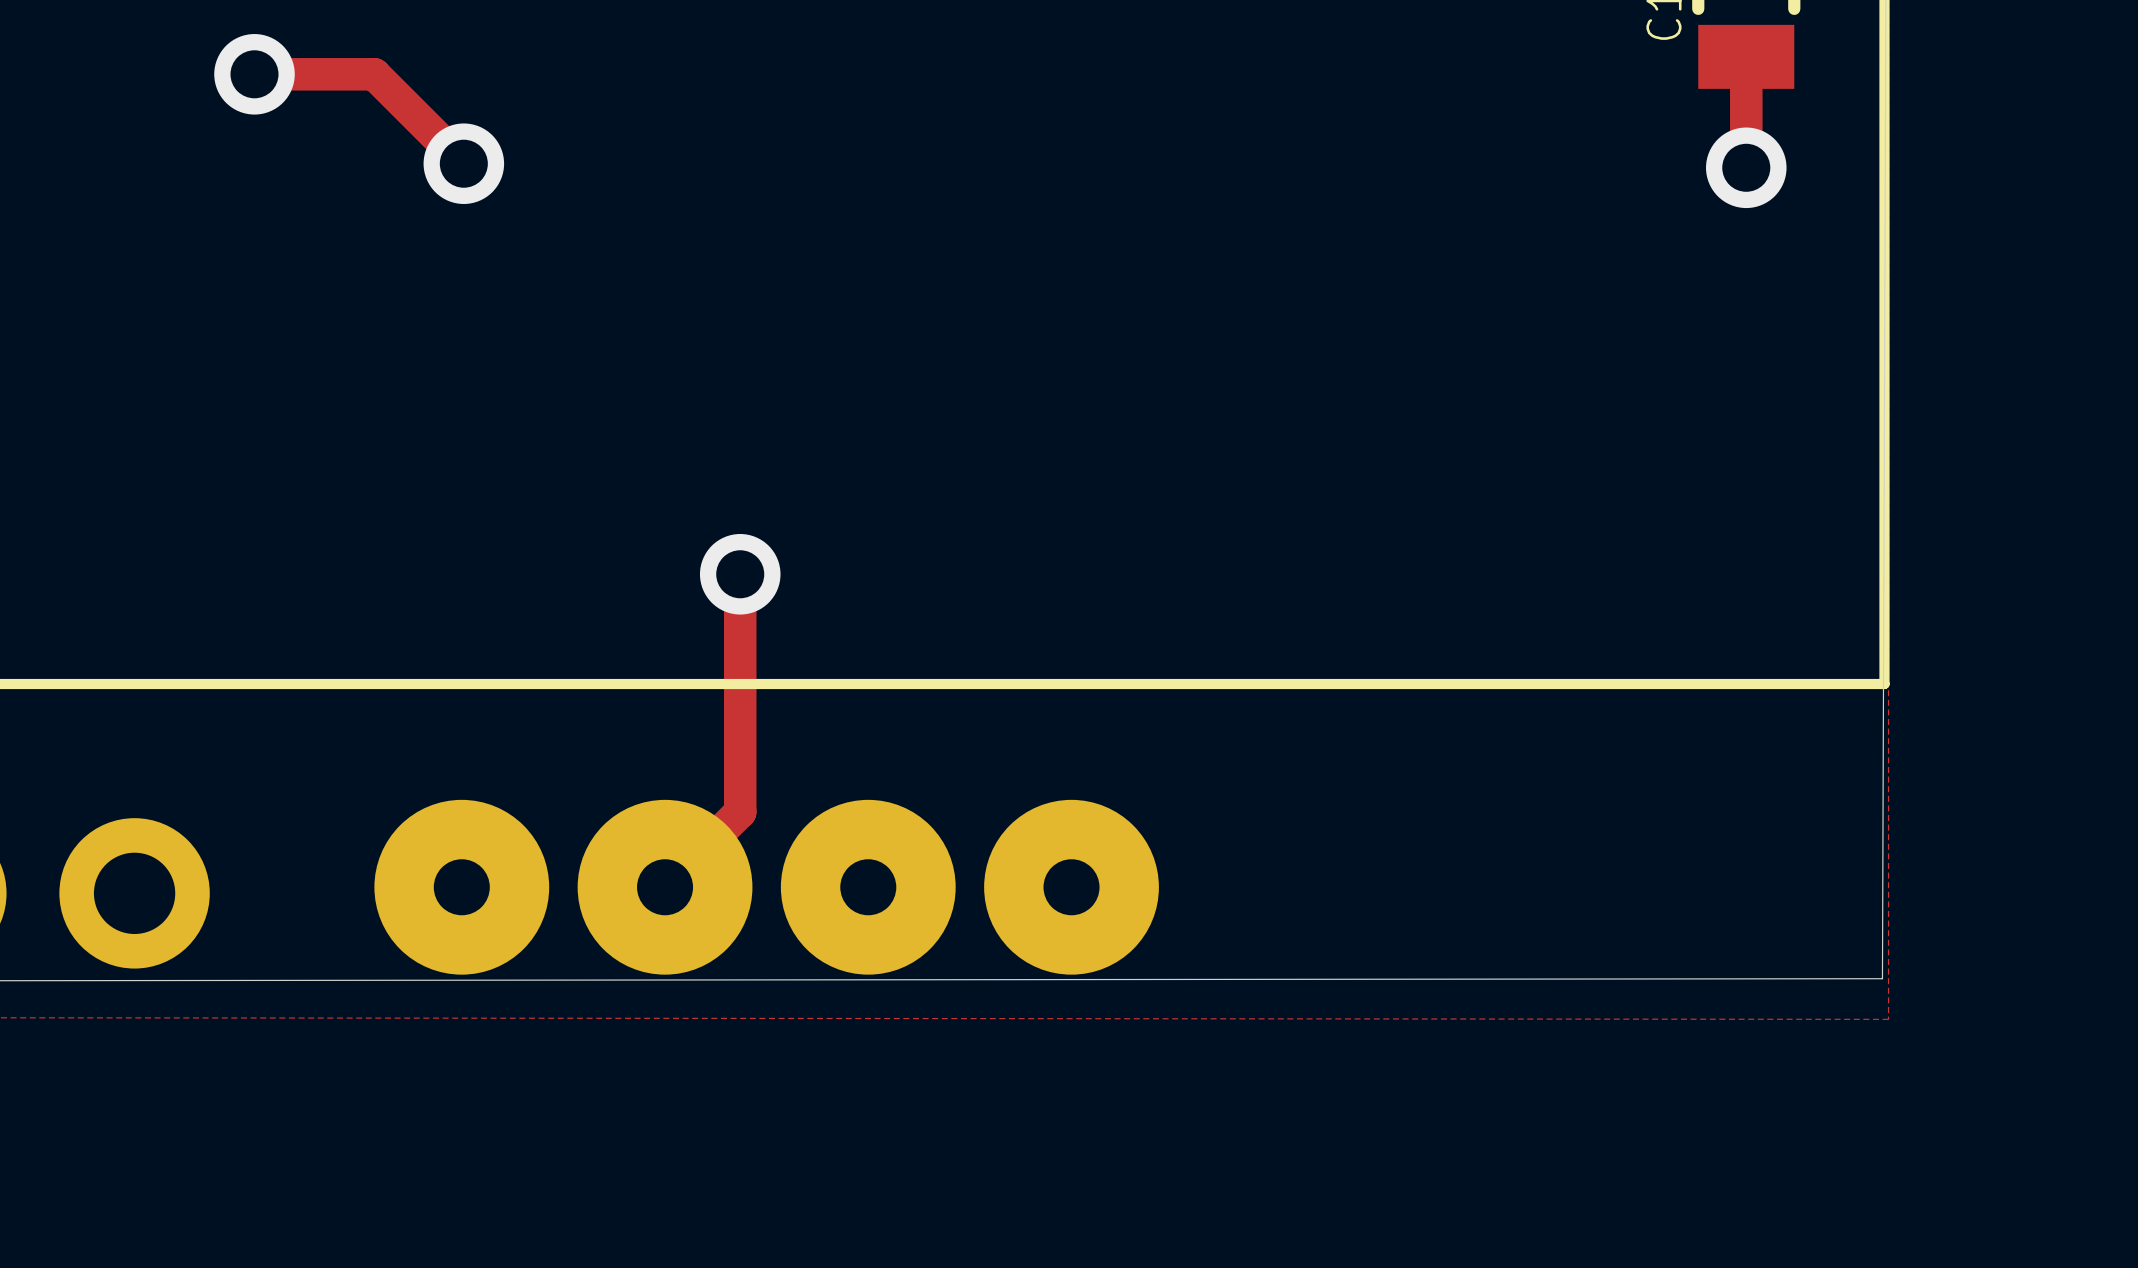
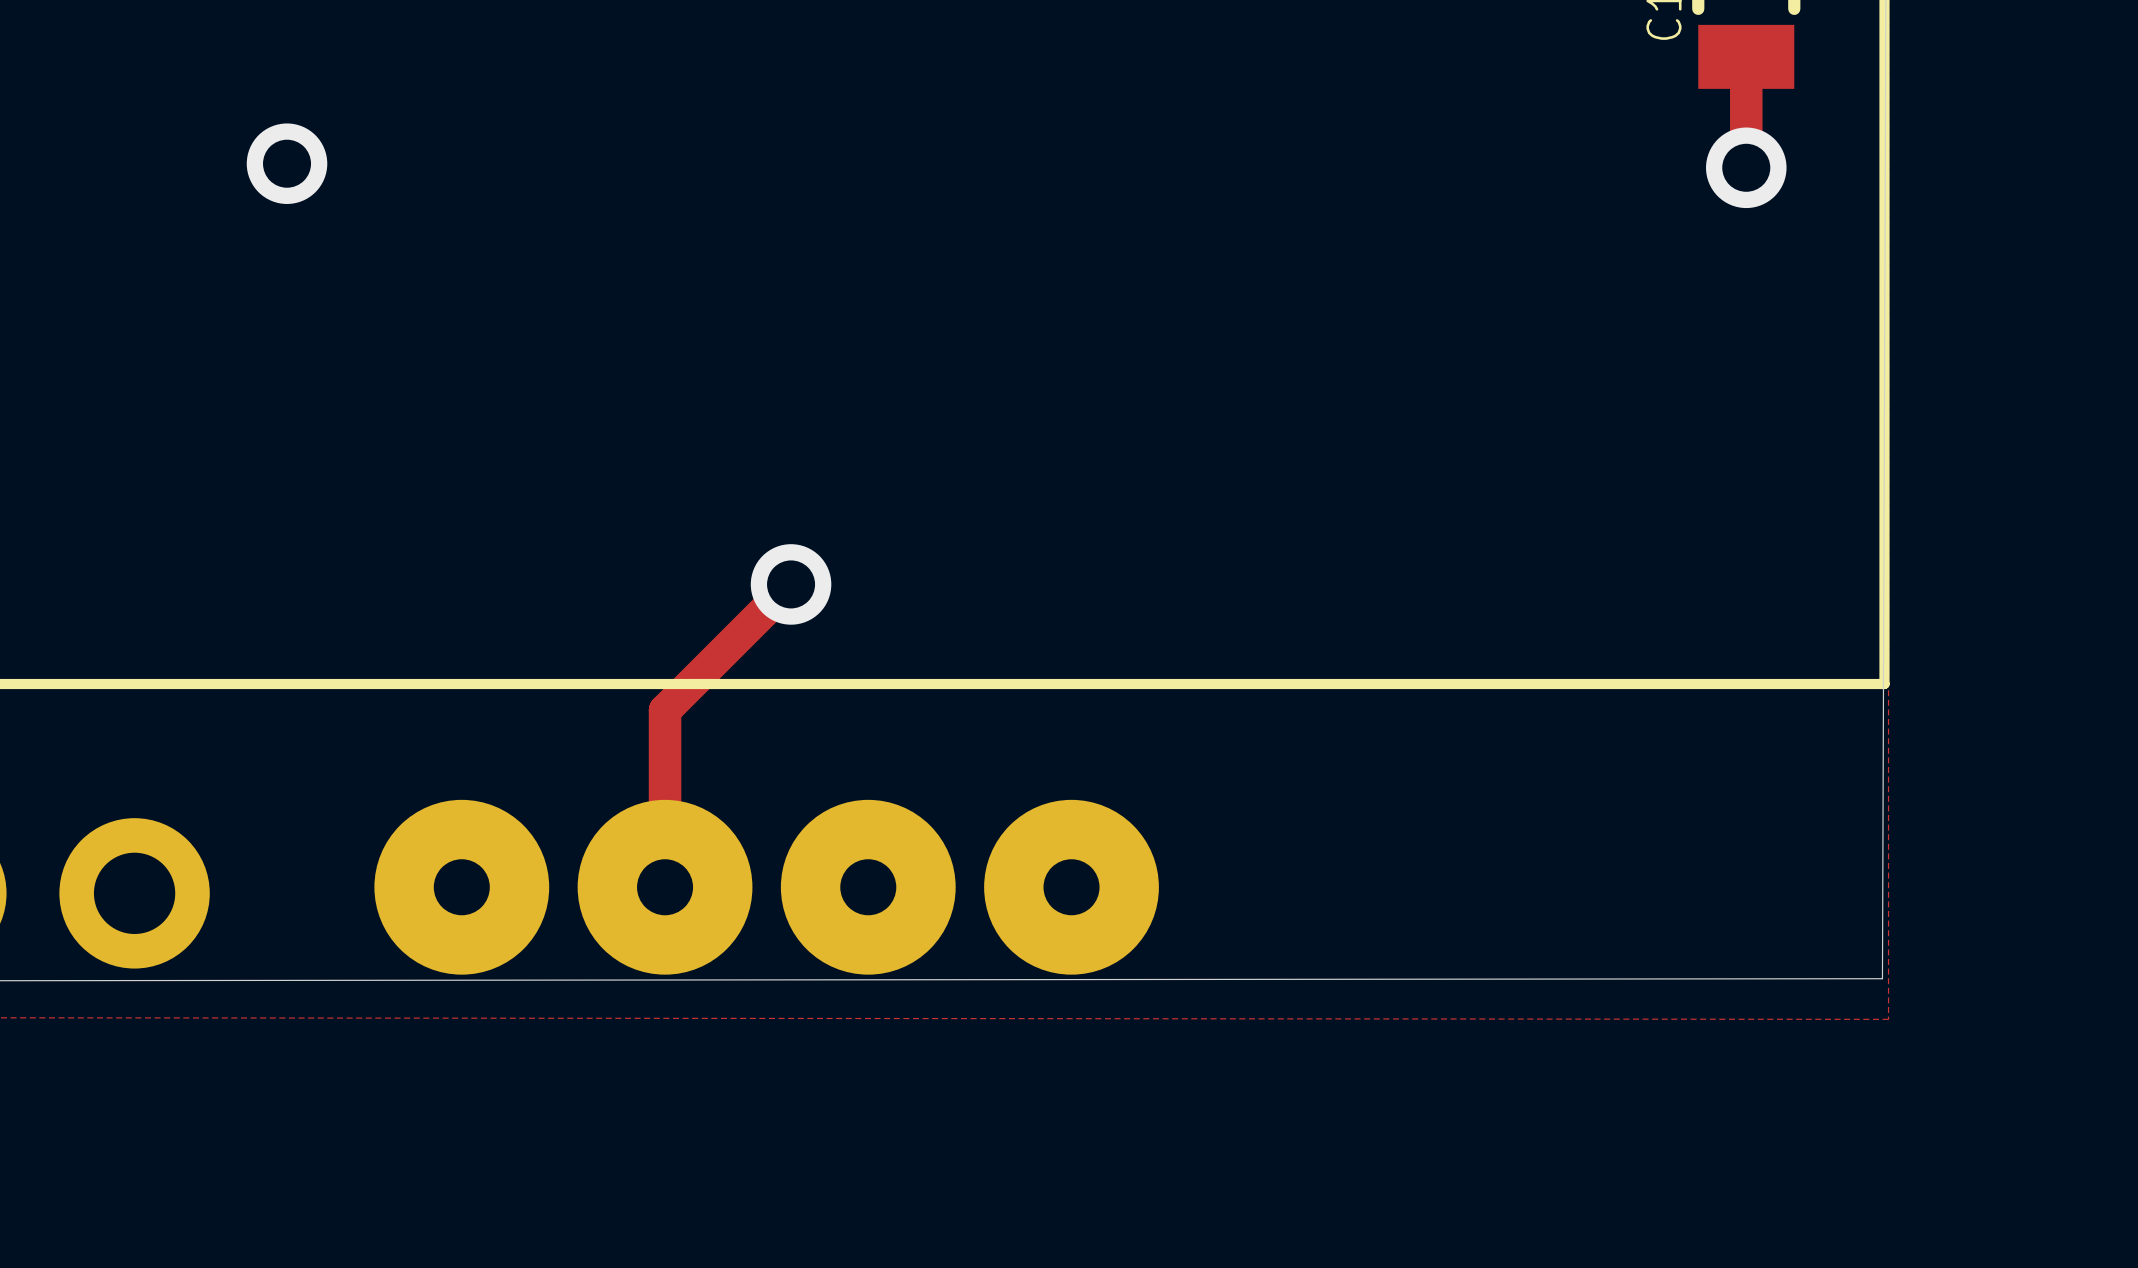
track: (254, 74) (374, 74) (463, 163) -> none
via: (254, 74) -> none
via: none -> (287, 163)
via: (463, 163) -> none
track: (740, 574) (740, 812) (665, 887) -> (791, 584) (665, 710) (665, 887)
via position: (740, 574) -> (791, 584)

